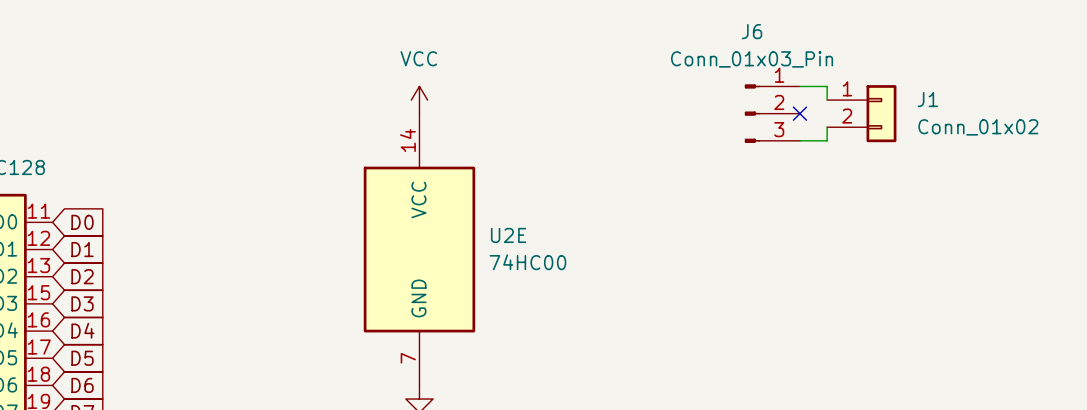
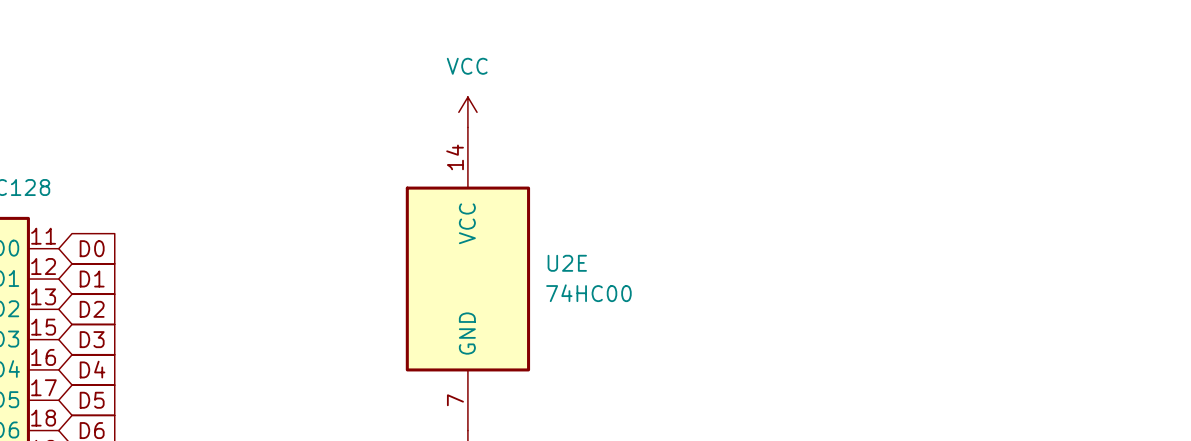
wire: (799, 86) (827, 86) (827, 100) -> none
J6: Conn_01x03_Pin (772, 113) -> none
no-connect mark: (799, 113) -> none
J1: Conn_01x02 (861, 113) -> none
wire: (827, 127) (827, 140) (799, 140) -> none

